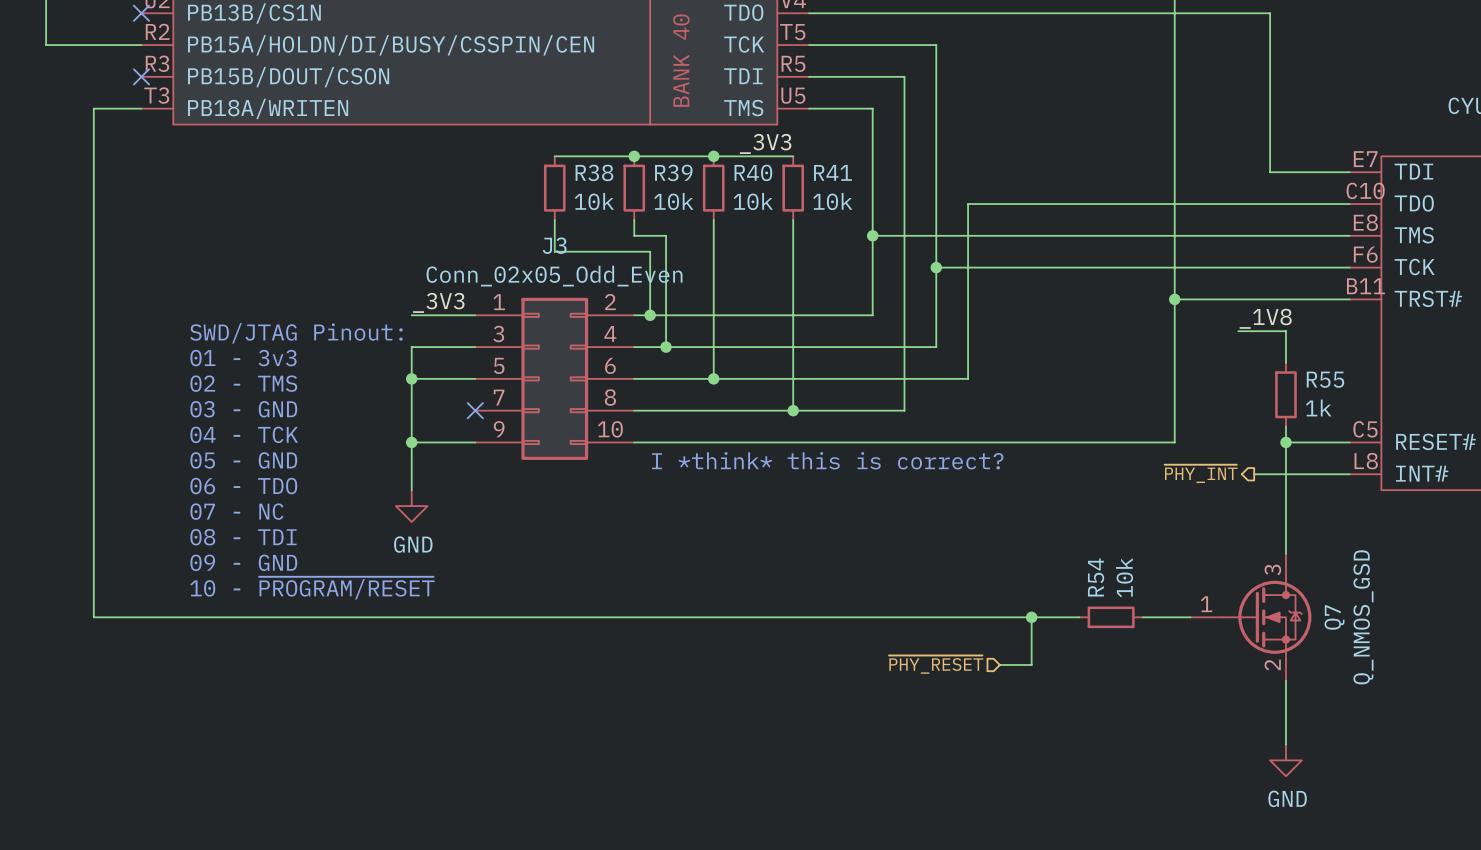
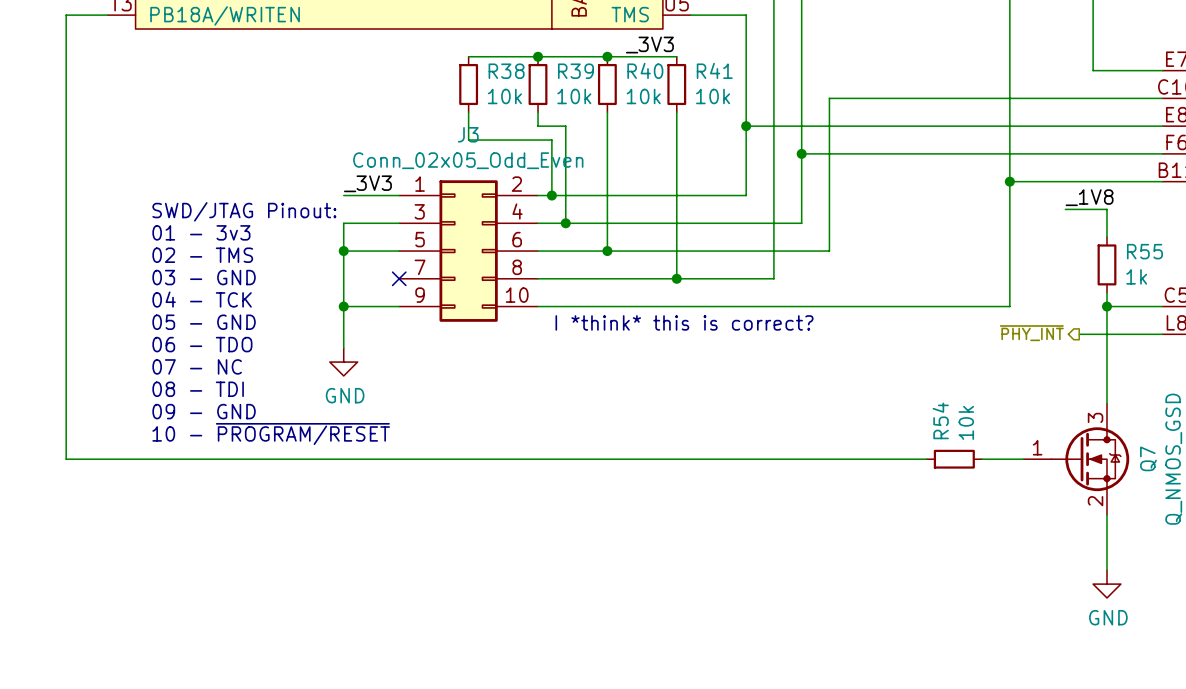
wire: (1031, 617) (1031, 665) (999, 665) -> none
junction: (1031, 617) -> none
hierarchical label: ~{PHY_RESET} (936, 664) -> none

